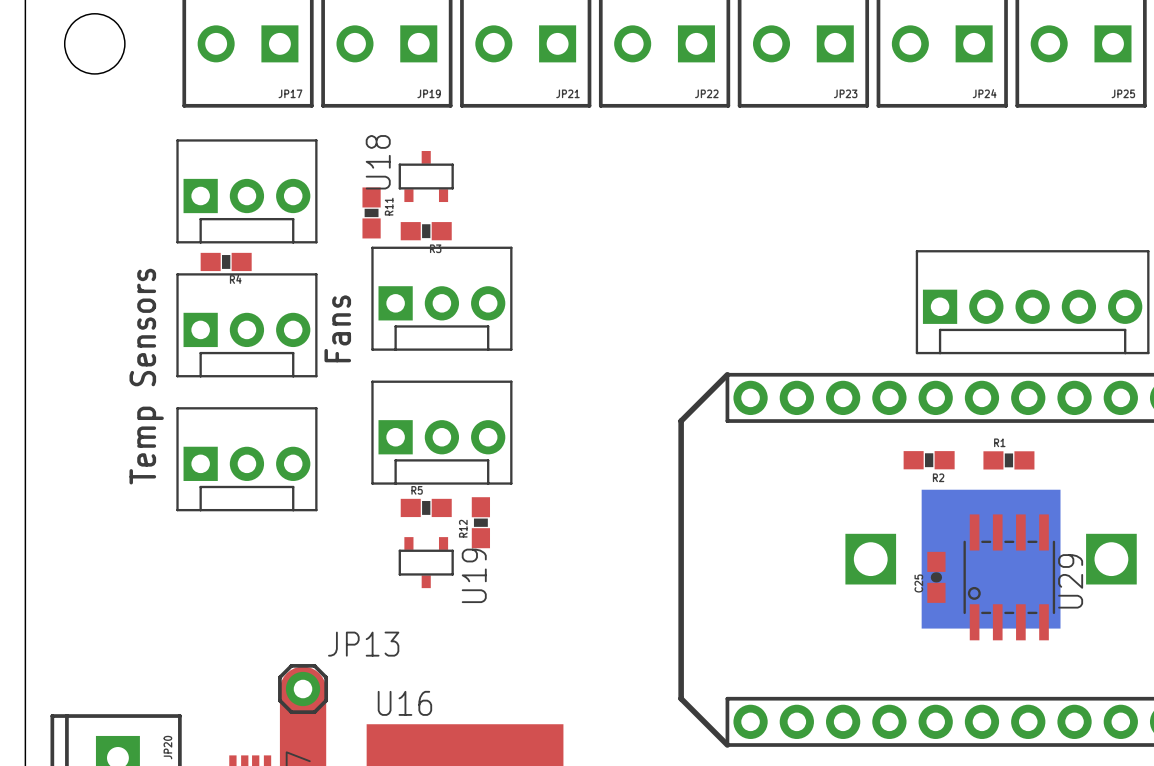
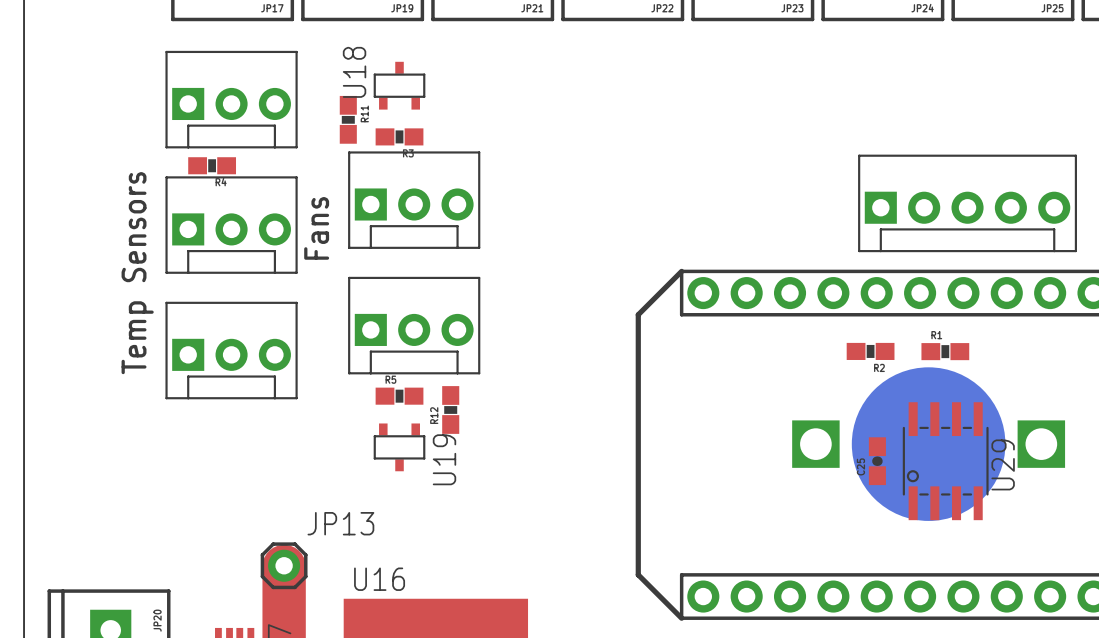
part footprint: [845, 489, 1137, 629] -> [792, 367, 1066, 521]

